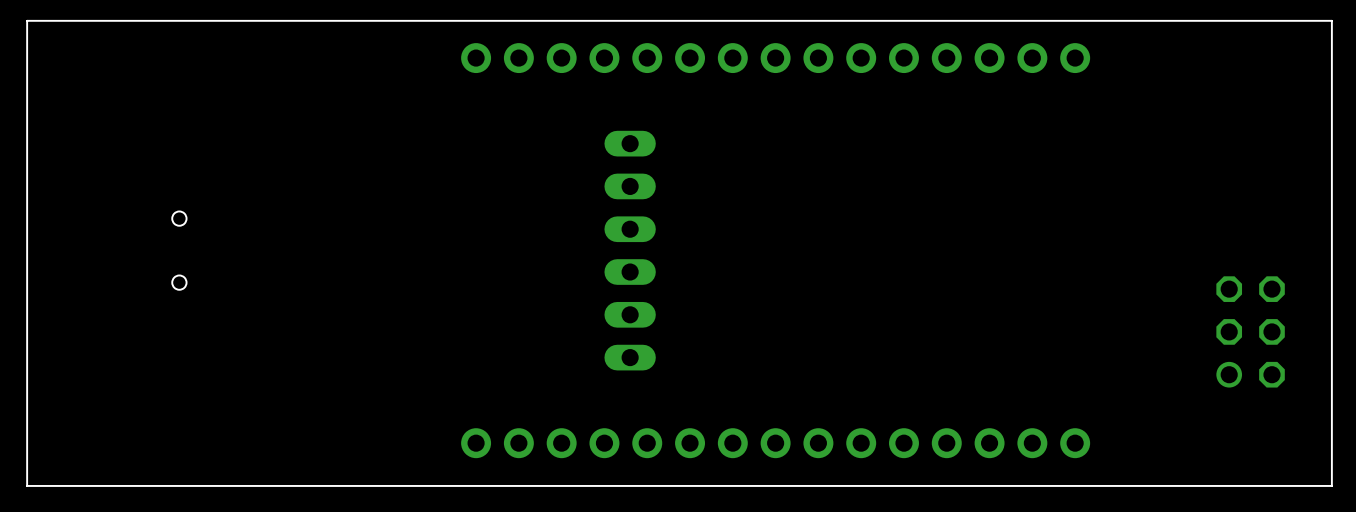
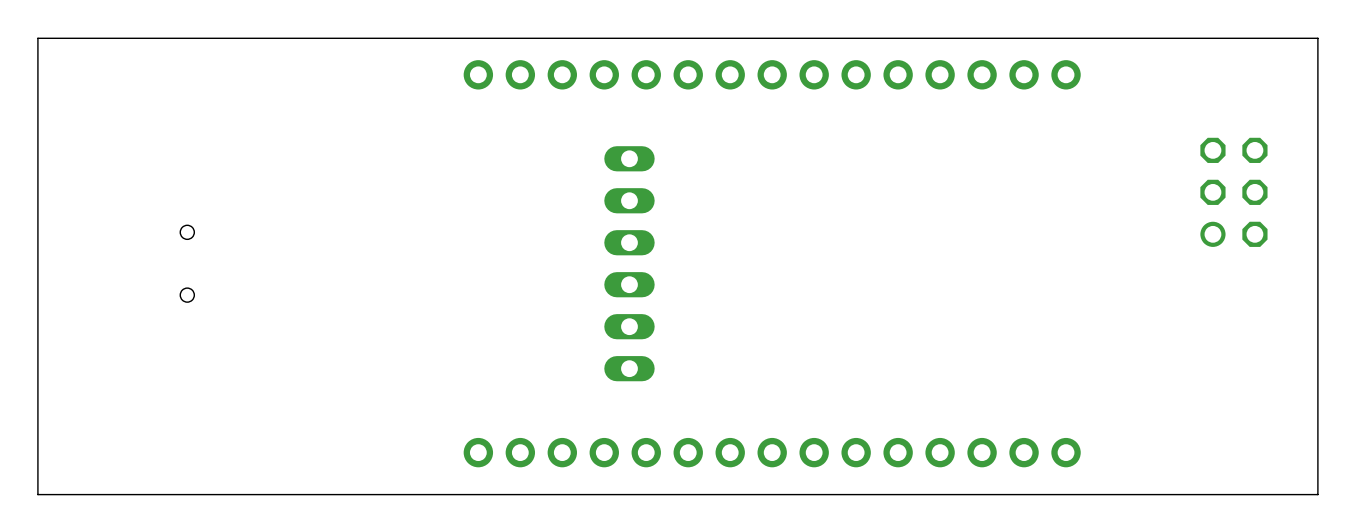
part position: (1250, 331) -> (1233, 192)

